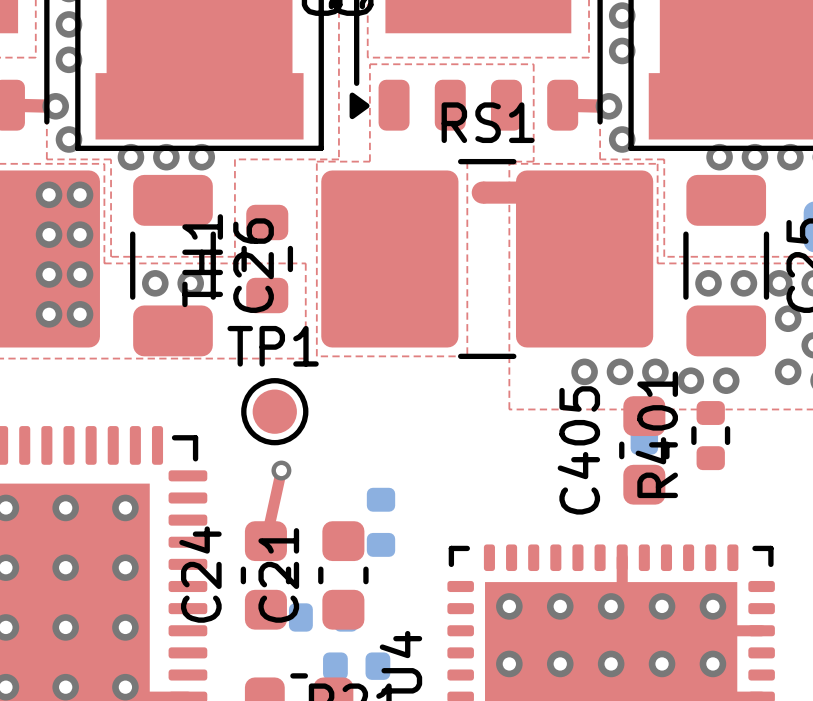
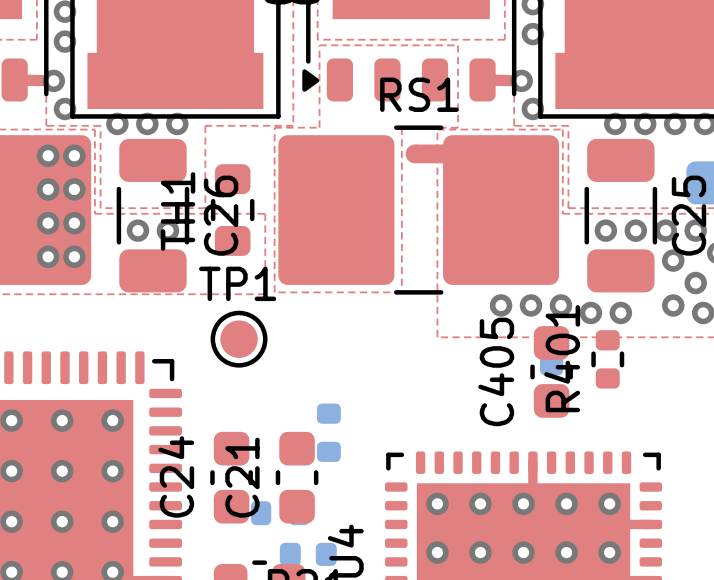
top track: (281, 470) (265, 541) -> none
via: (281, 470) -> none

